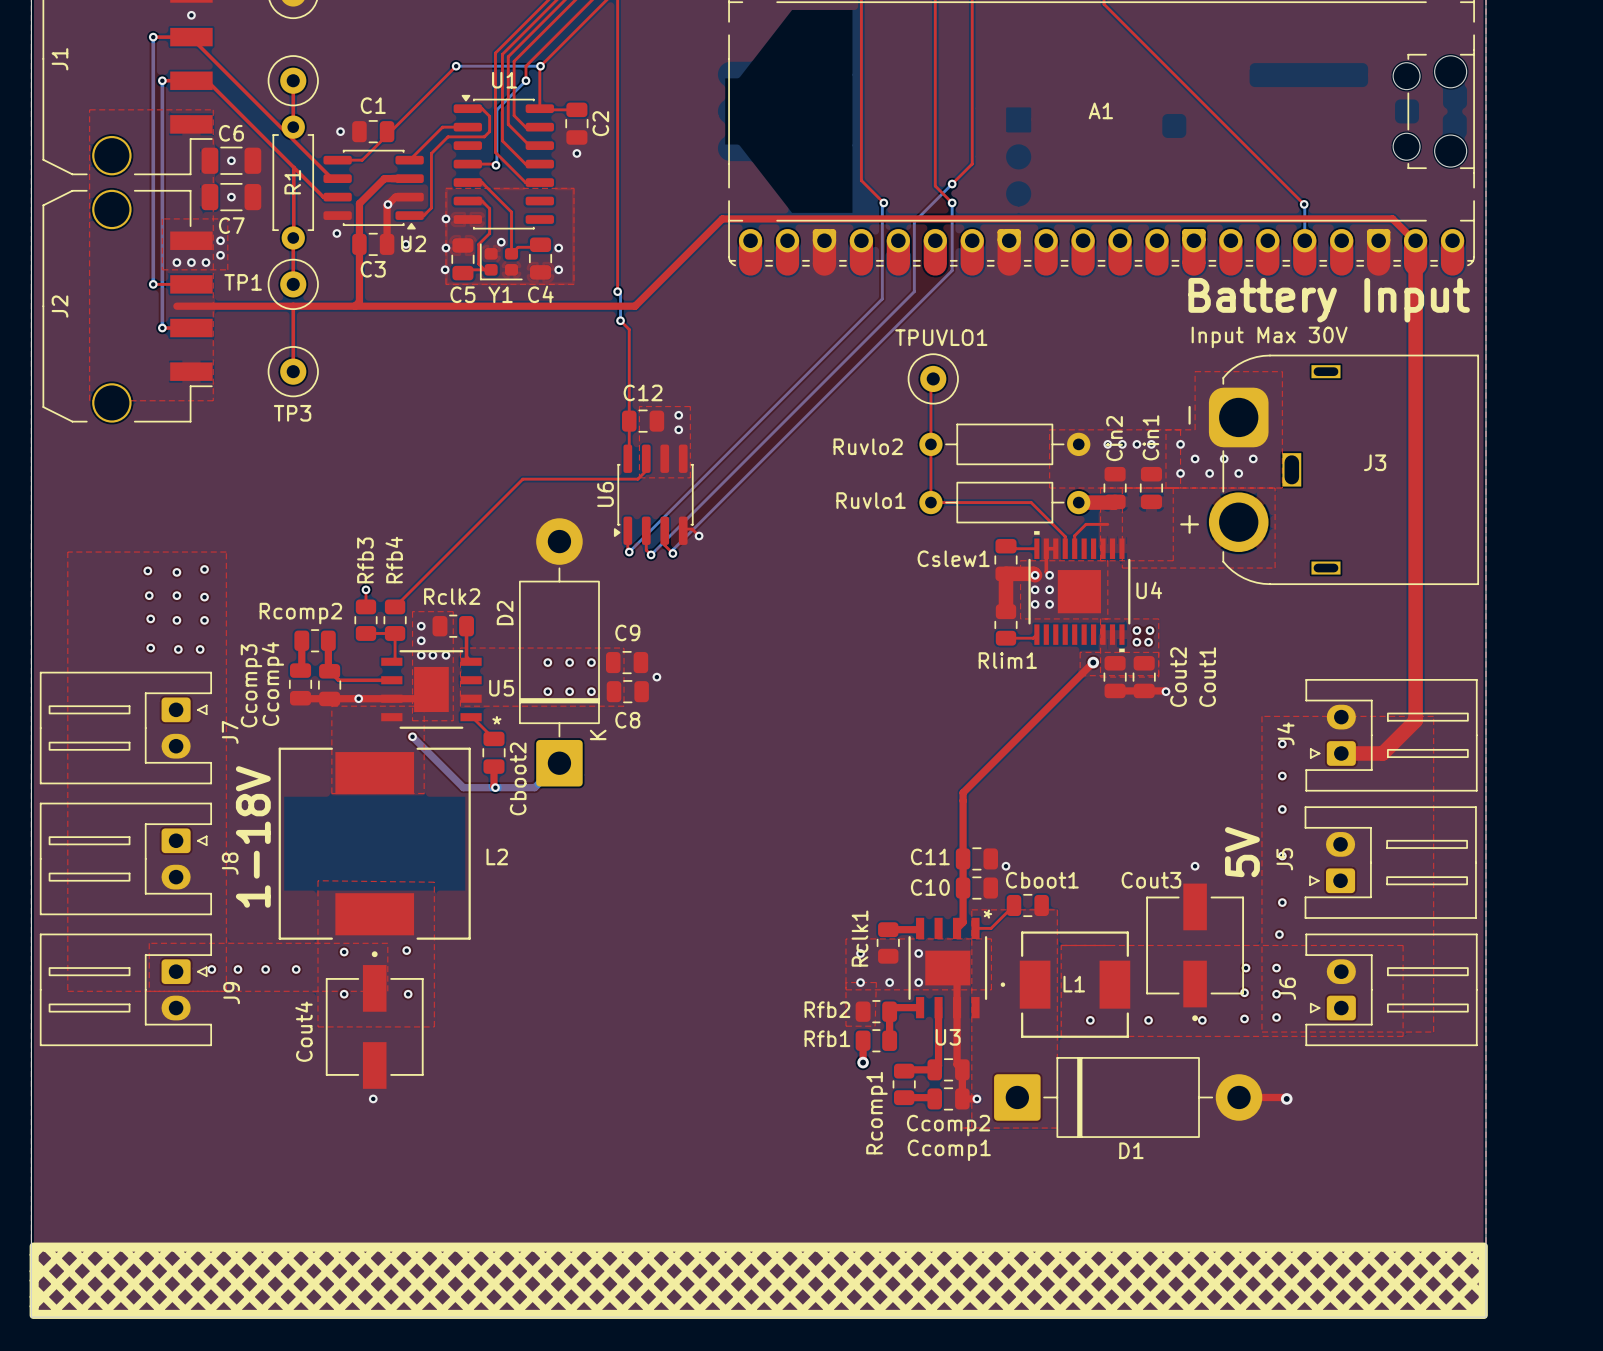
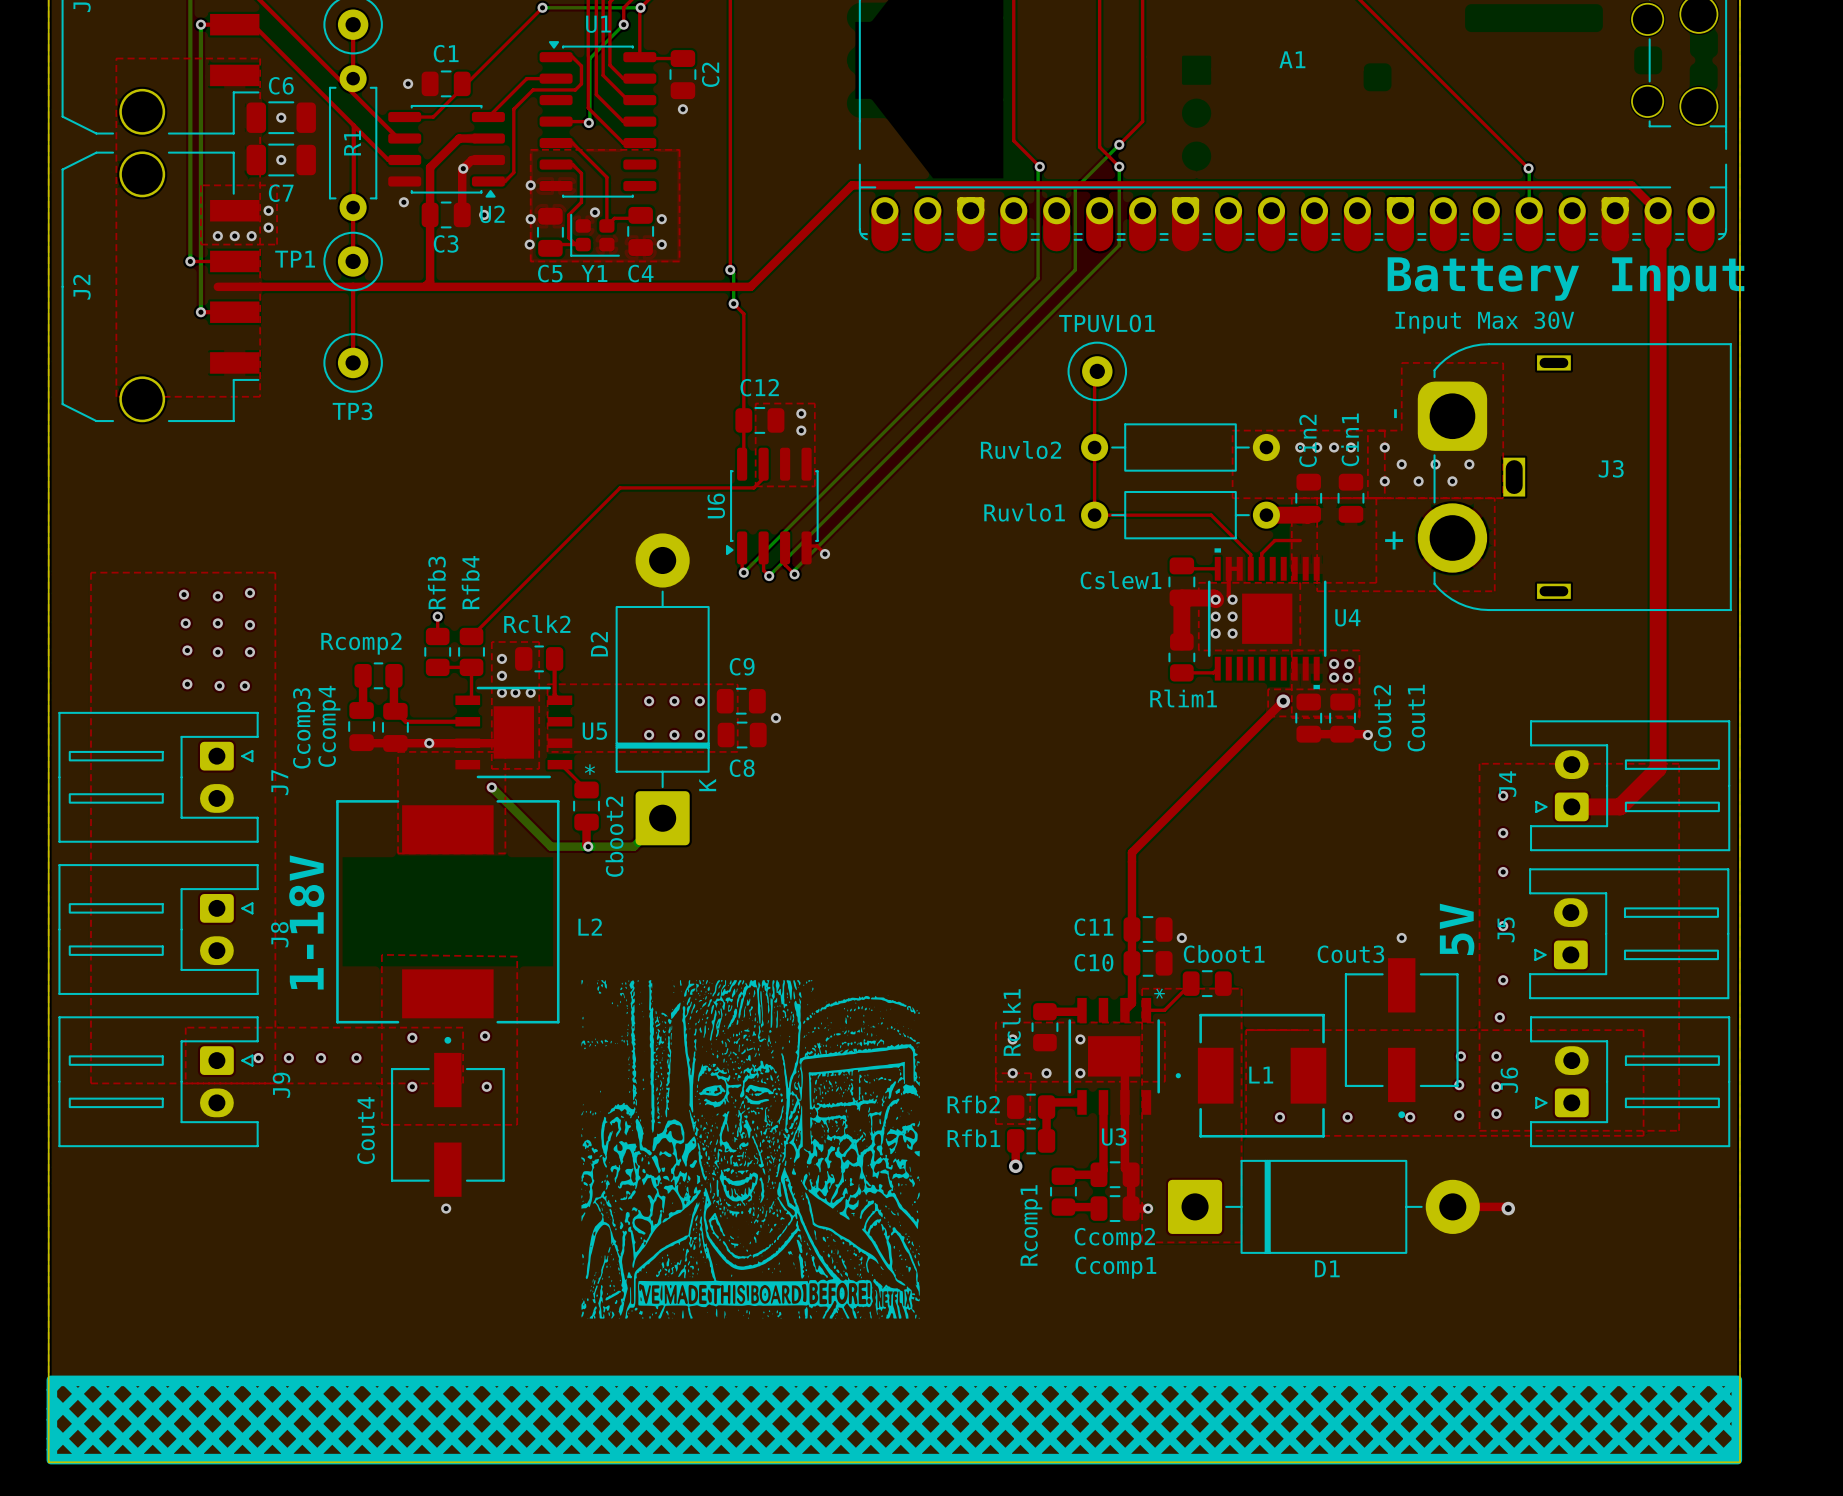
drawing: none -> [581, 980, 920, 1319]

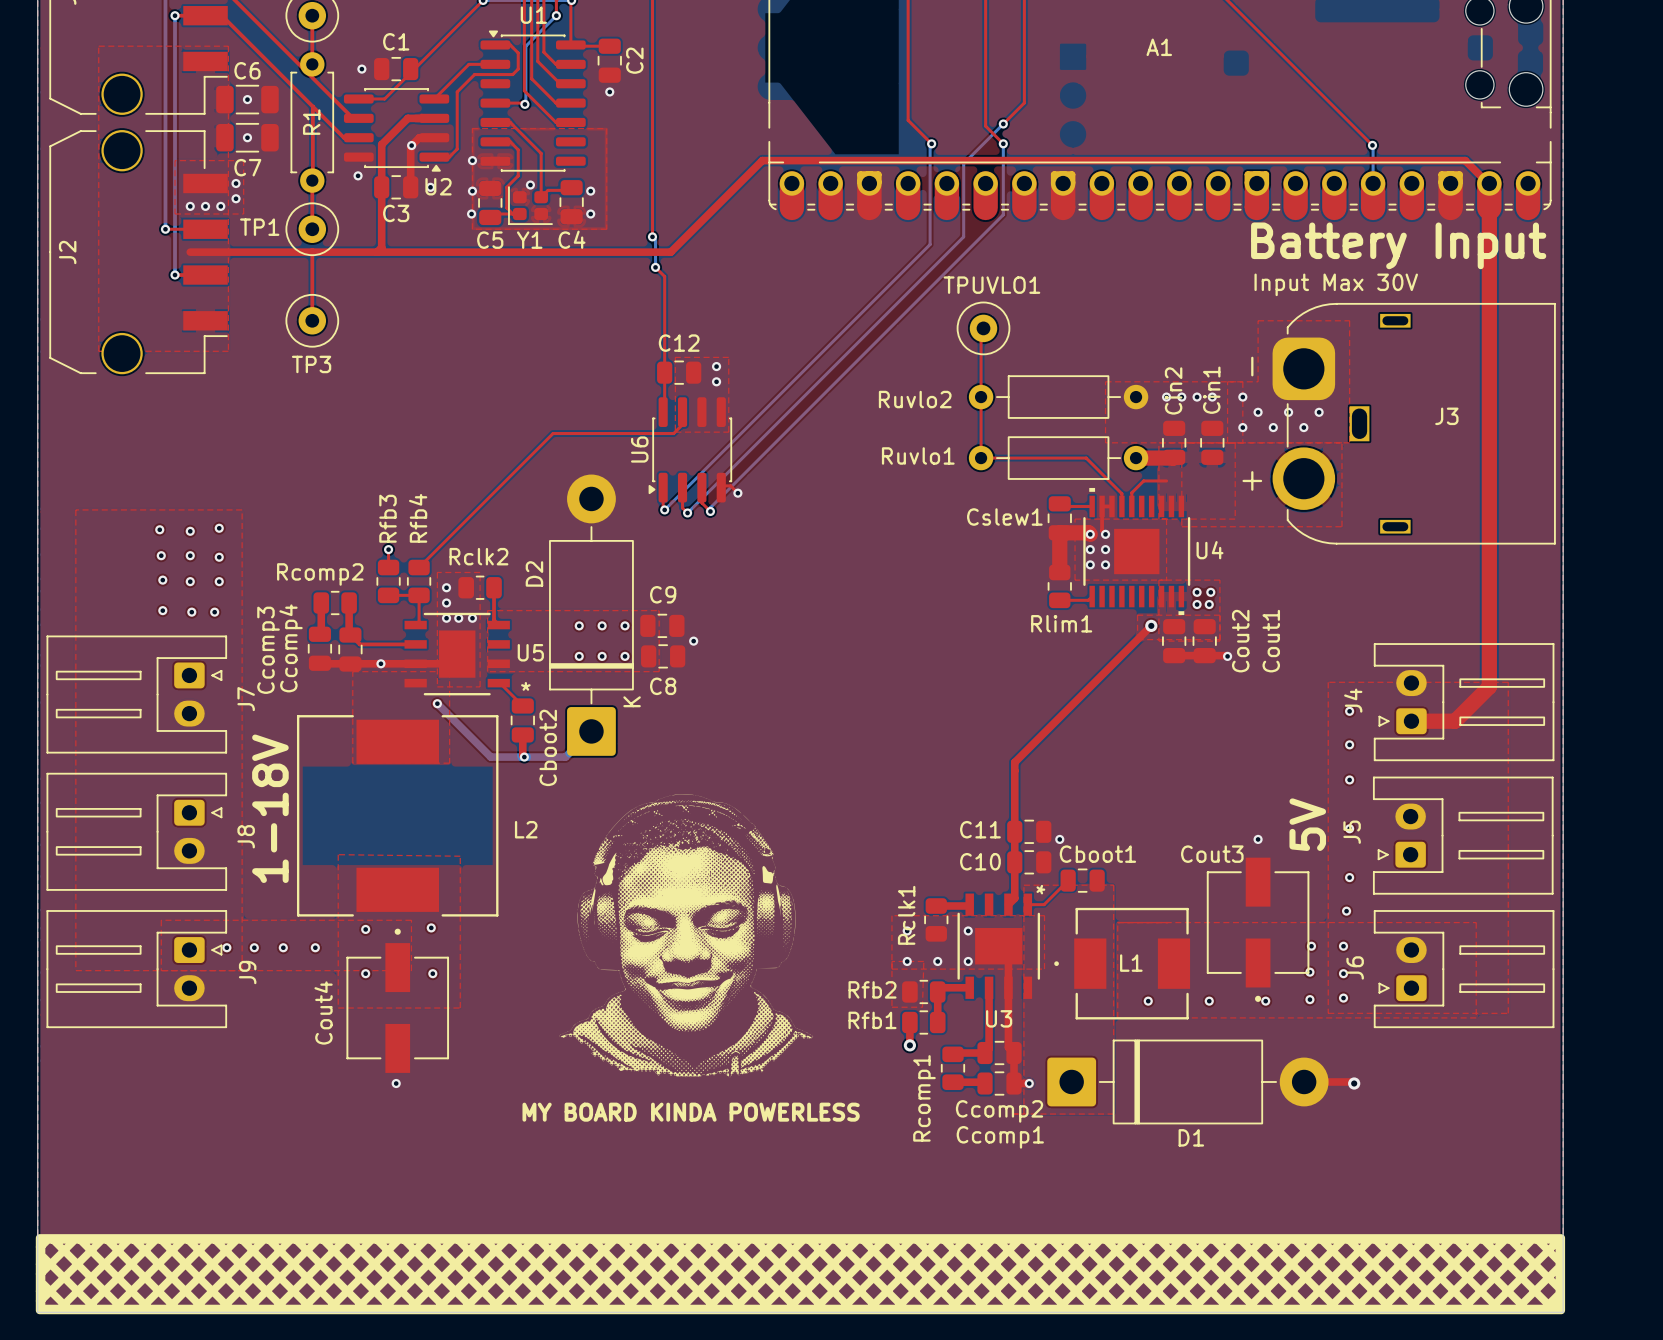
drawing: none -> [558, 794, 814, 1078]
drawing: [581, 980, 920, 1319] -> none
text: none -> MY BOARD KINDA POWERLESS (691, 1112)

